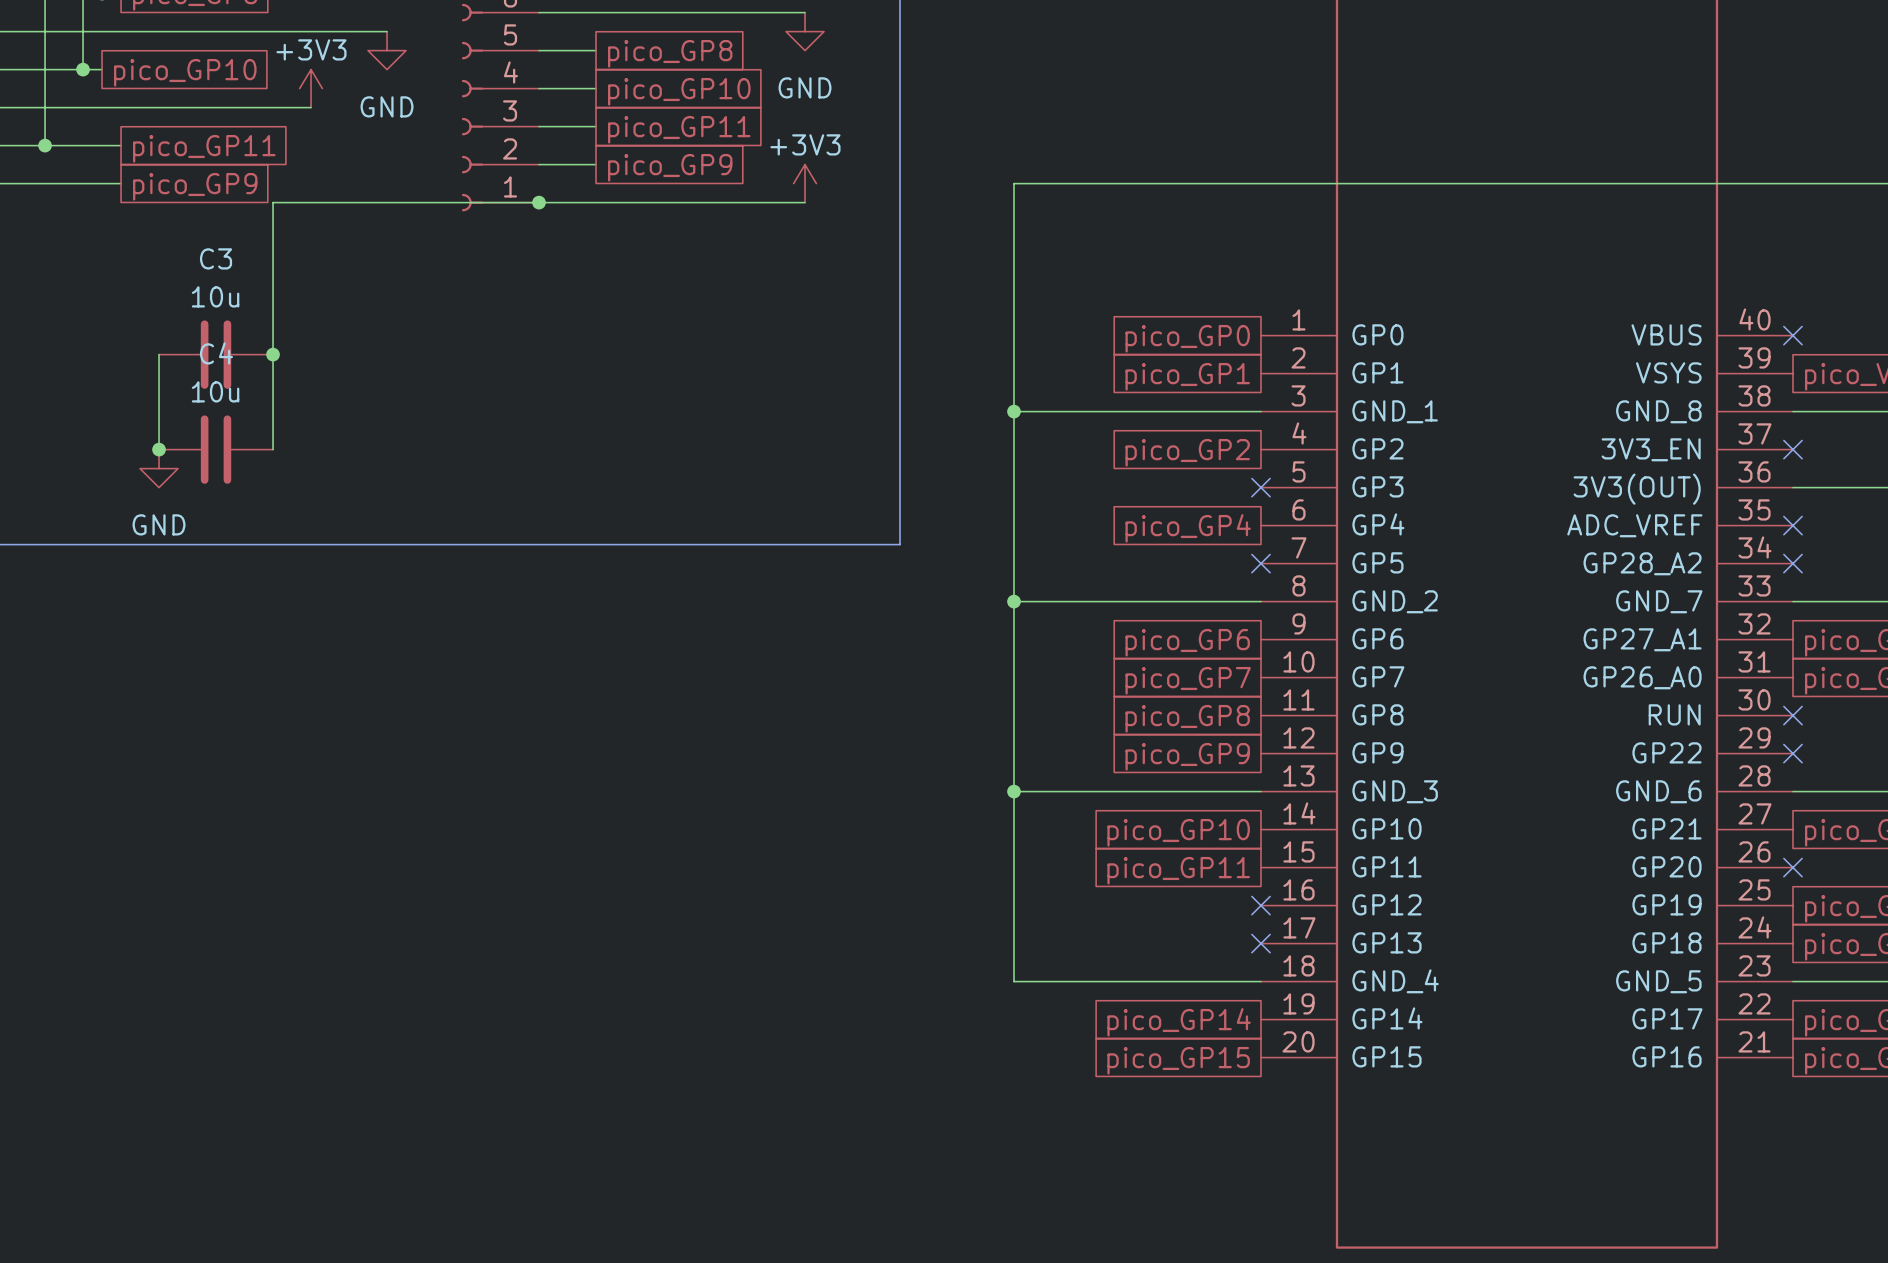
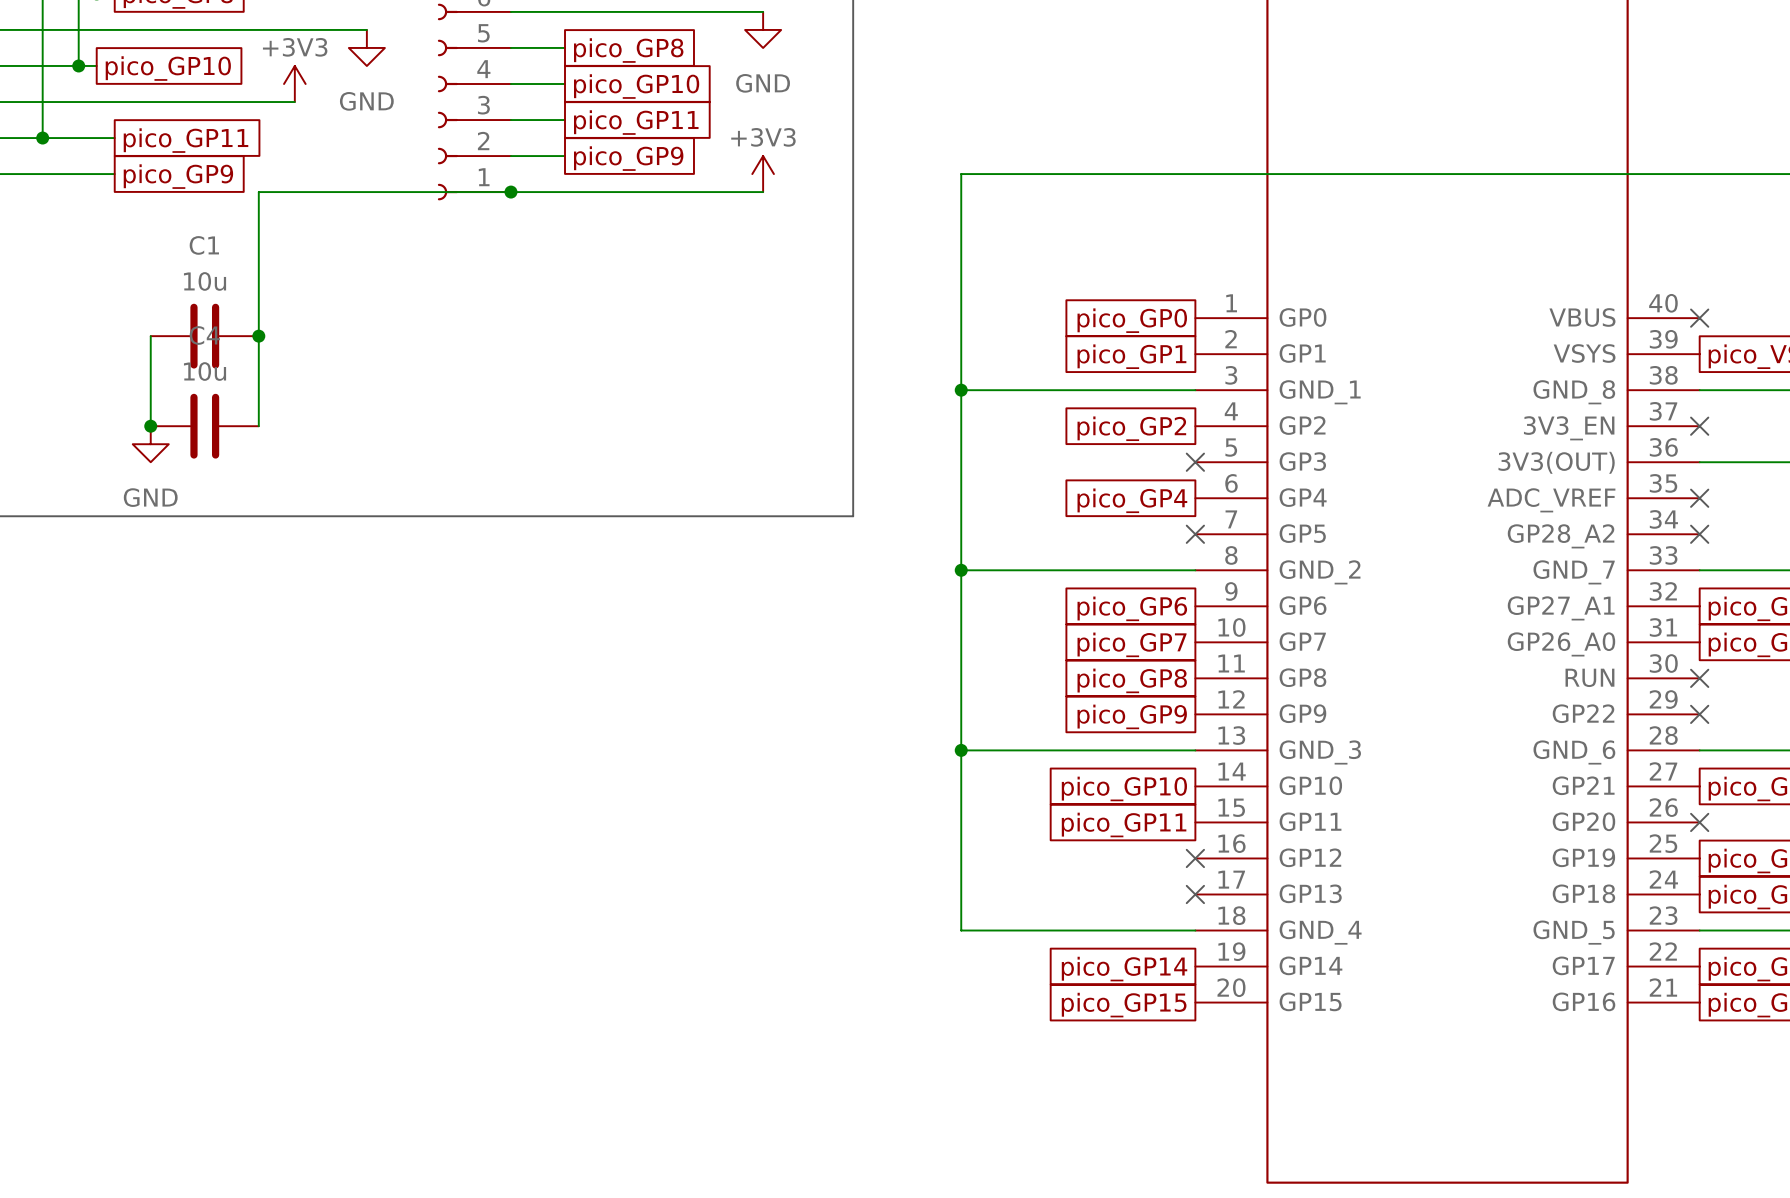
C3 name: C3 (216, 258) -> C1 (204, 245)

